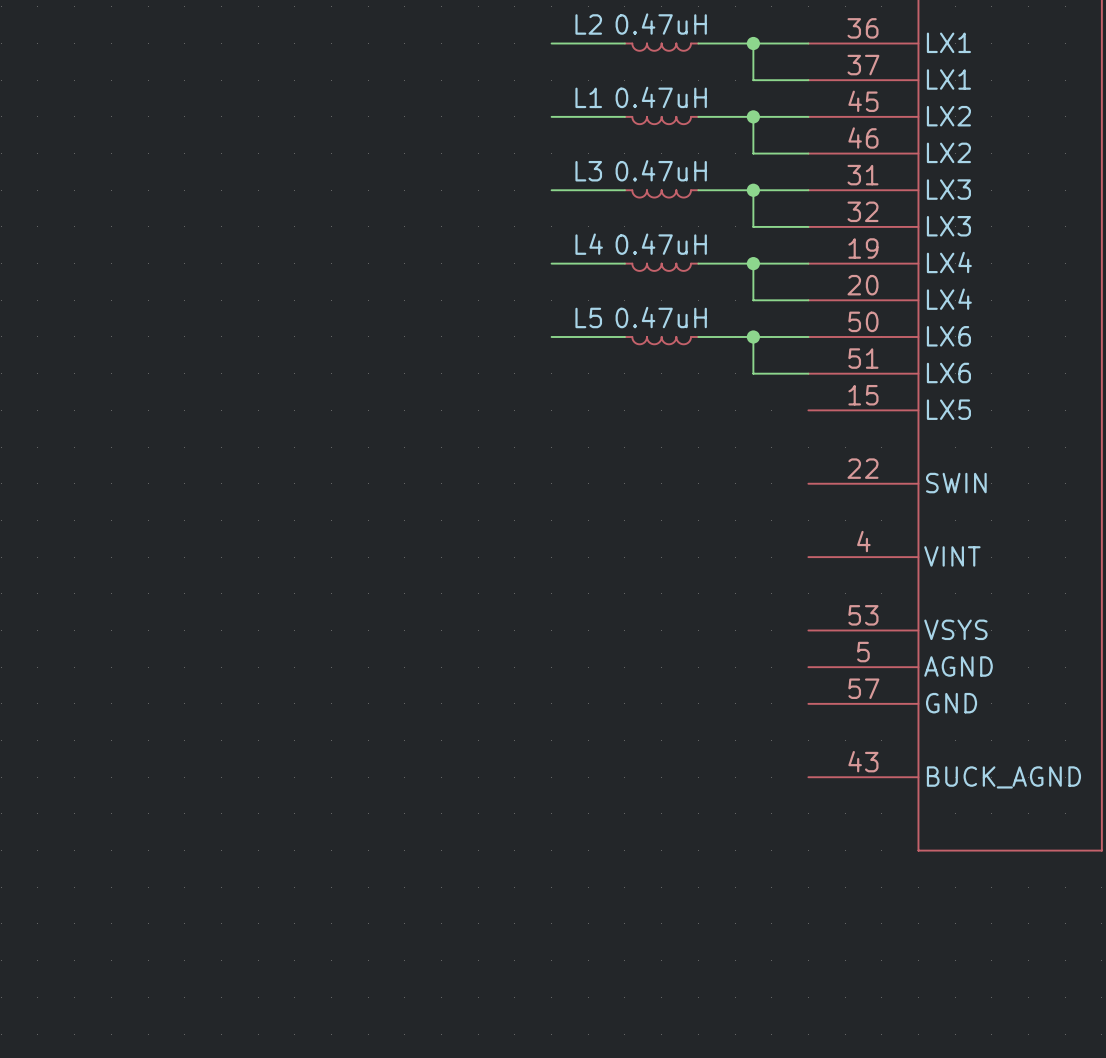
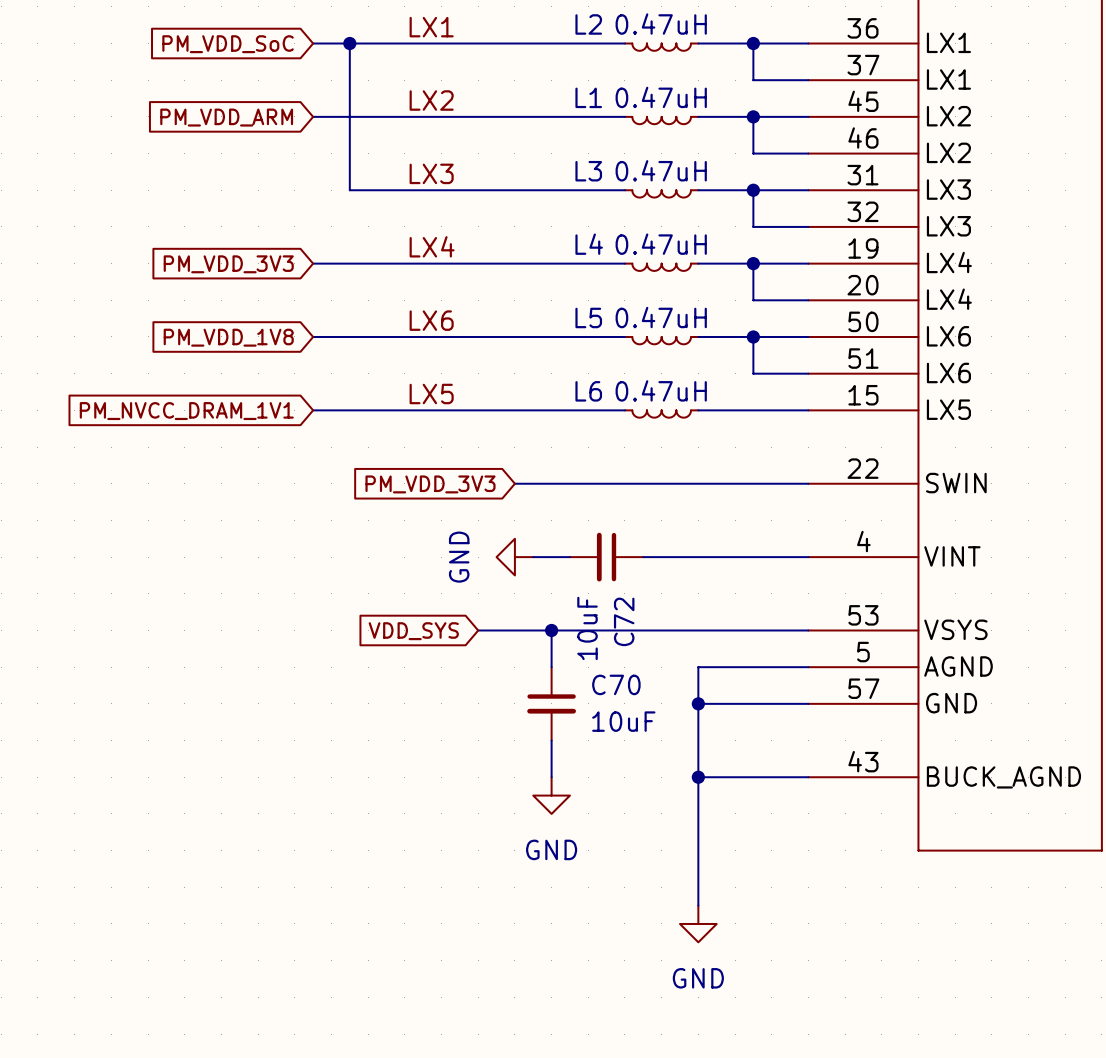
label: none -> LX1 (431, 27)
wire: none -> (313, 43) (551, 43)
wire: none -> (349, 43) (349, 190) (551, 190)
junction: none -> (349, 43)
global label: none -> PM_VDD_SoC (228, 44)
label: none -> LX2 (431, 100)
wire: none -> (313, 116) (551, 116)
global label: none -> PM_VDD_ARM (226, 117)
label: none -> LX3 (431, 173)
label: none -> LX4 (432, 246)
wire: none -> (313, 263) (551, 263)
global label: none -> PM_VDD_3V3 (228, 264)
label: none -> LX6 (431, 320)
wire: none -> (313, 336) (551, 336)
global label: none -> PM_VDD_1V8 (228, 337)
label: none -> LX5 (431, 394)
wire: none -> (313, 410) (624, 410)
wire: none -> (698, 410) (808, 410)
global label: none -> PM_NVCC_DRAM_1V1 (186, 411)
L6: none -> 0.47uH (661, 414)
wire: none -> (514, 483) (808, 483)
global label: none -> PM_VDD_3V3 (430, 484)
power symbol: none -> GND (514, 557)
wire: none -> (533, 557) (569, 557)
C72: none -> 10uF (606, 557)
wire: none -> (643, 557) (808, 557)
wire: none -> (478, 630) (808, 630)
wire: none -> (551, 630) (551, 667)
junction: none -> (551, 630)
global label: none -> VDD_SYS (413, 631)
wire: none -> (808, 667) (698, 667) (698, 905)
C70: none -> 10uF (551, 703)
wire: none -> (698, 703) (808, 703)
junction: none -> (698, 703)
wire: none -> (551, 740) (551, 777)
wire: none -> (698, 777) (808, 777)
junction: none -> (698, 777)
power symbol: none -> GND (551, 795)
power symbol: none -> GND (698, 923)

